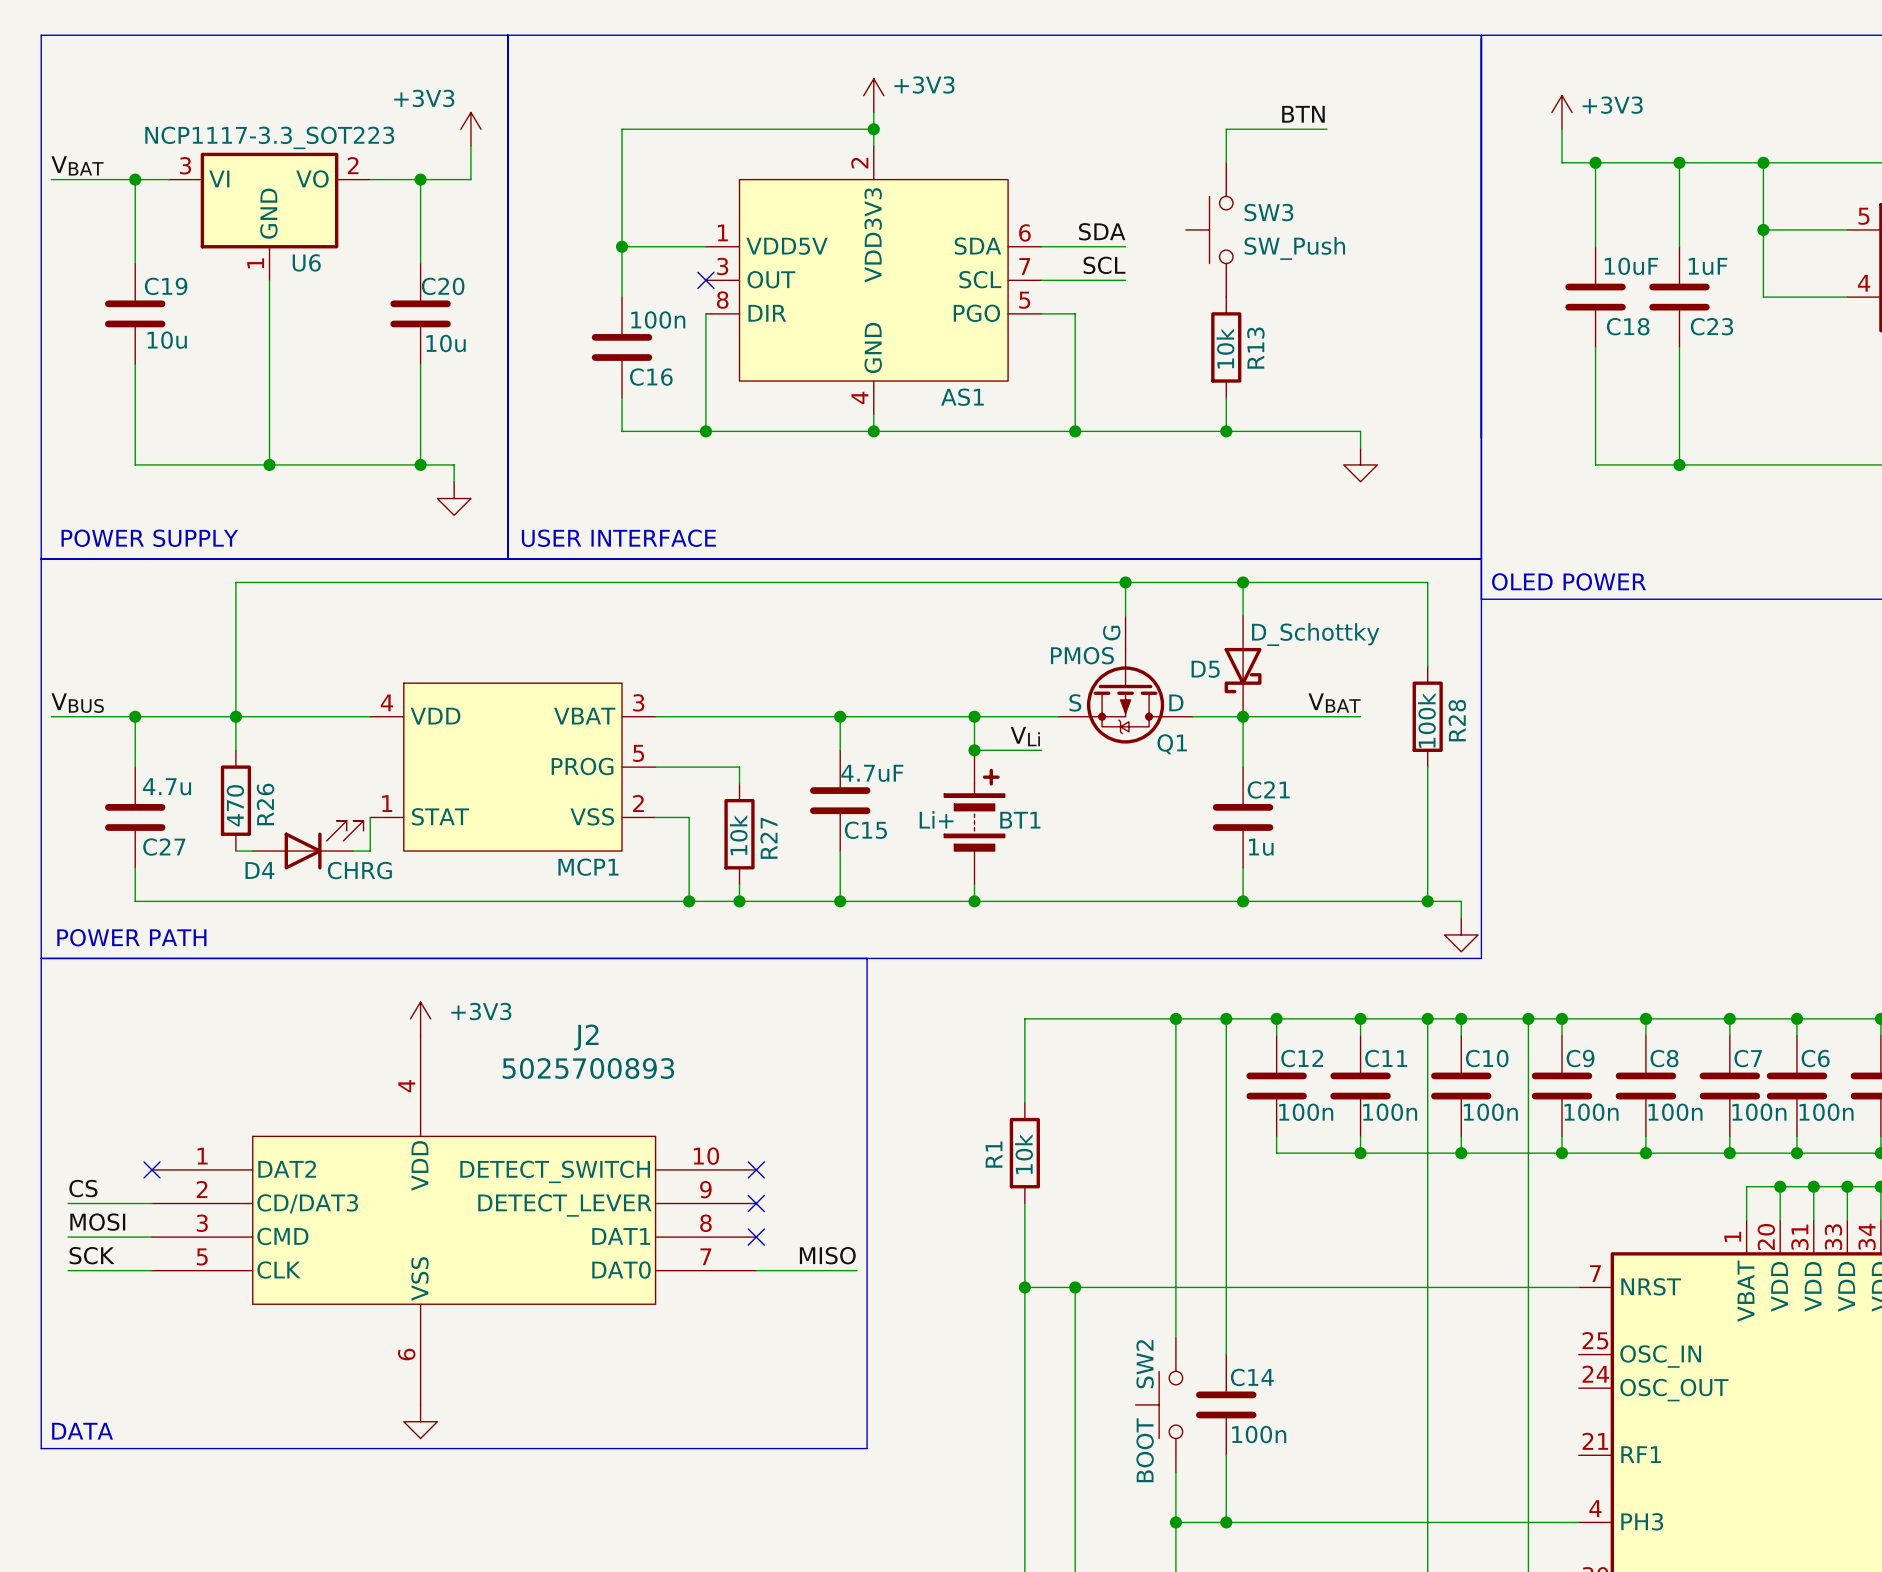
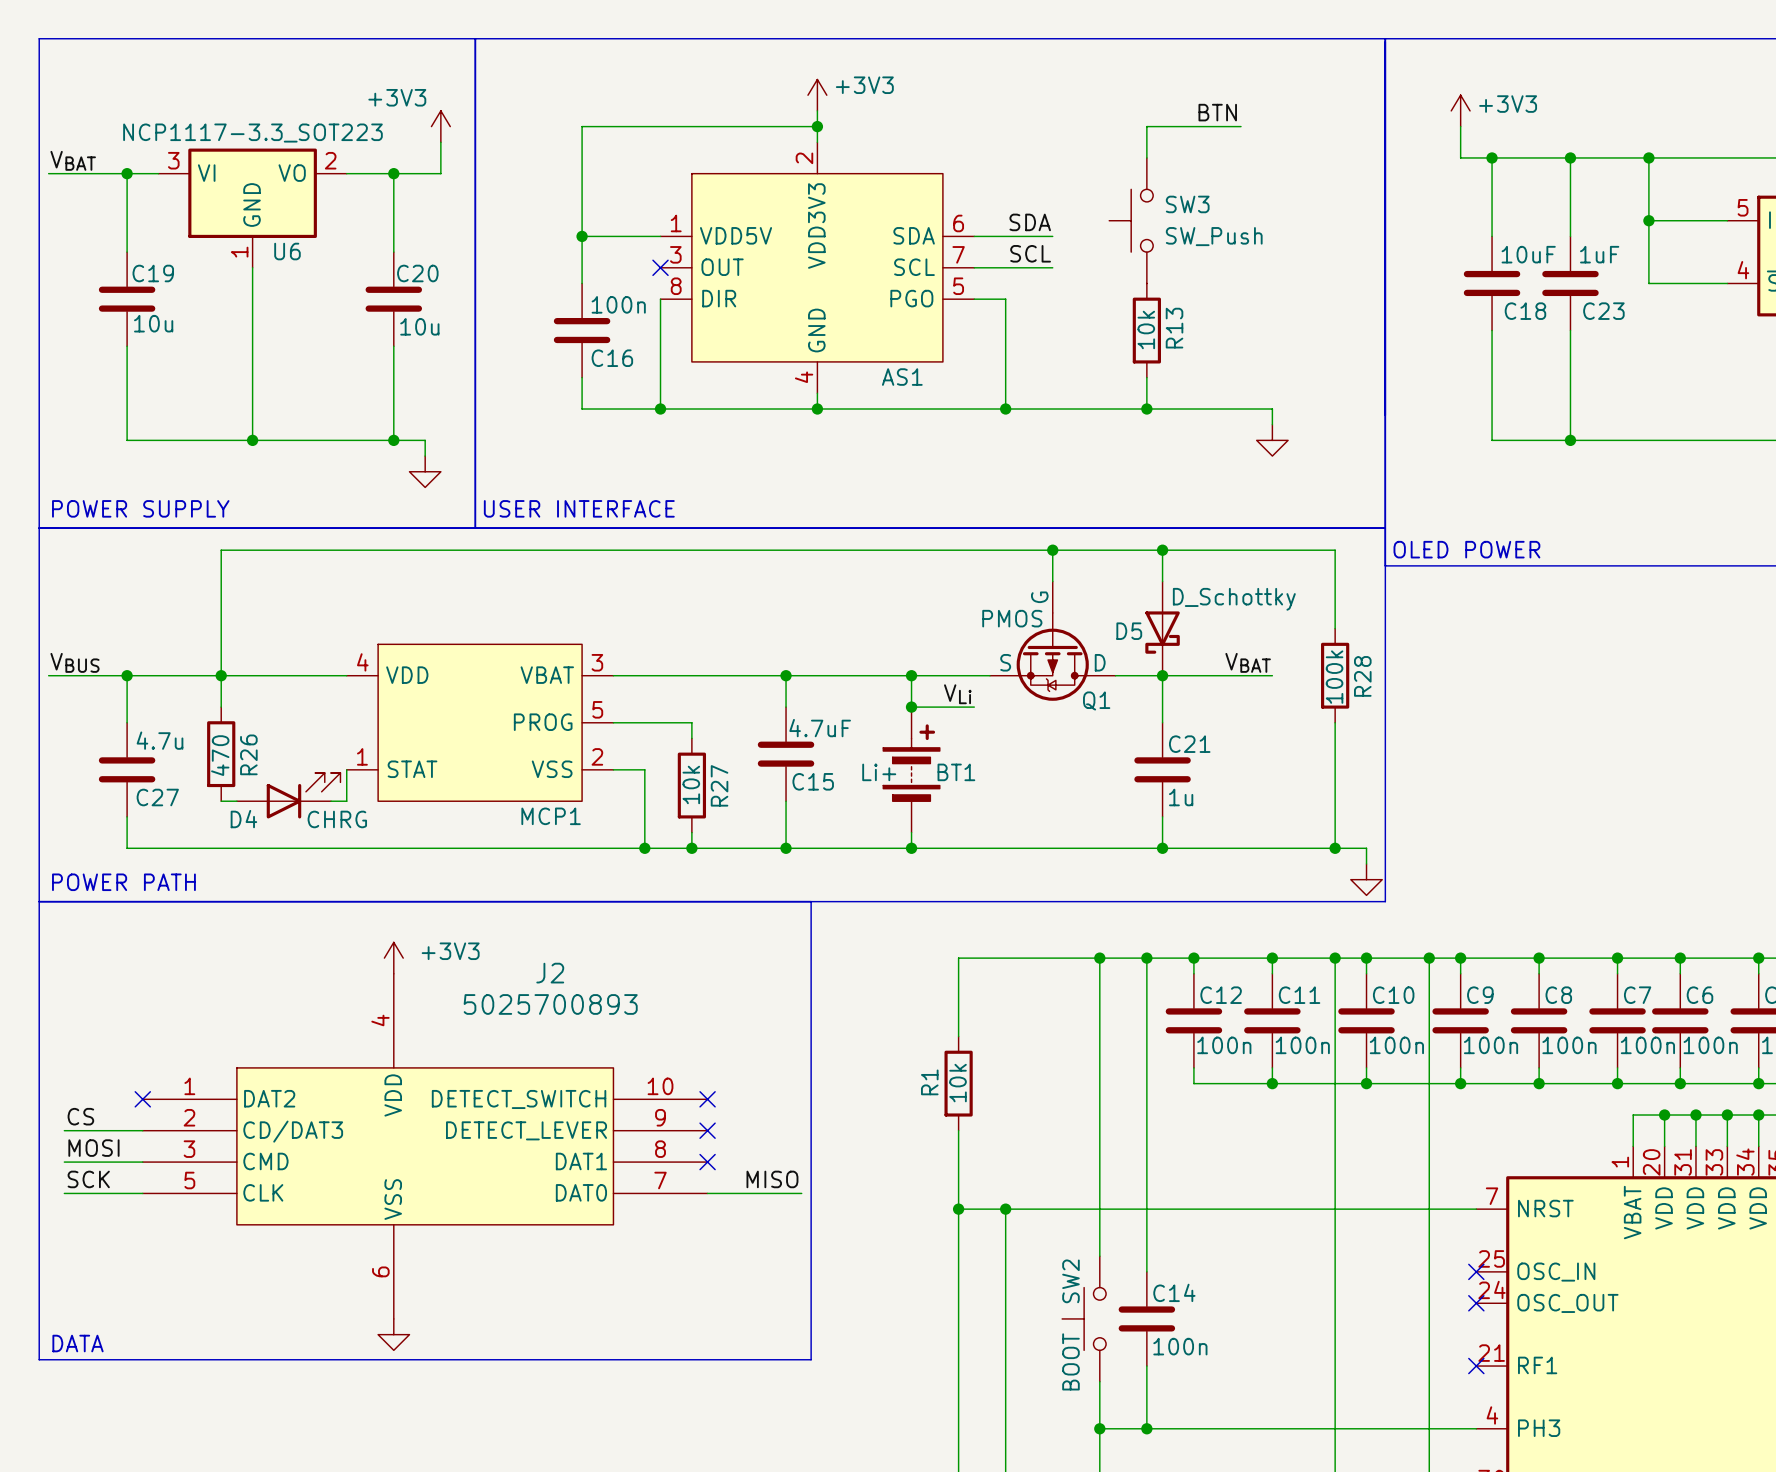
no-connect mark: none -> (1476, 1271)
no-connect mark: none -> (1476, 1303)
no-connect mark: none -> (1476, 1366)

